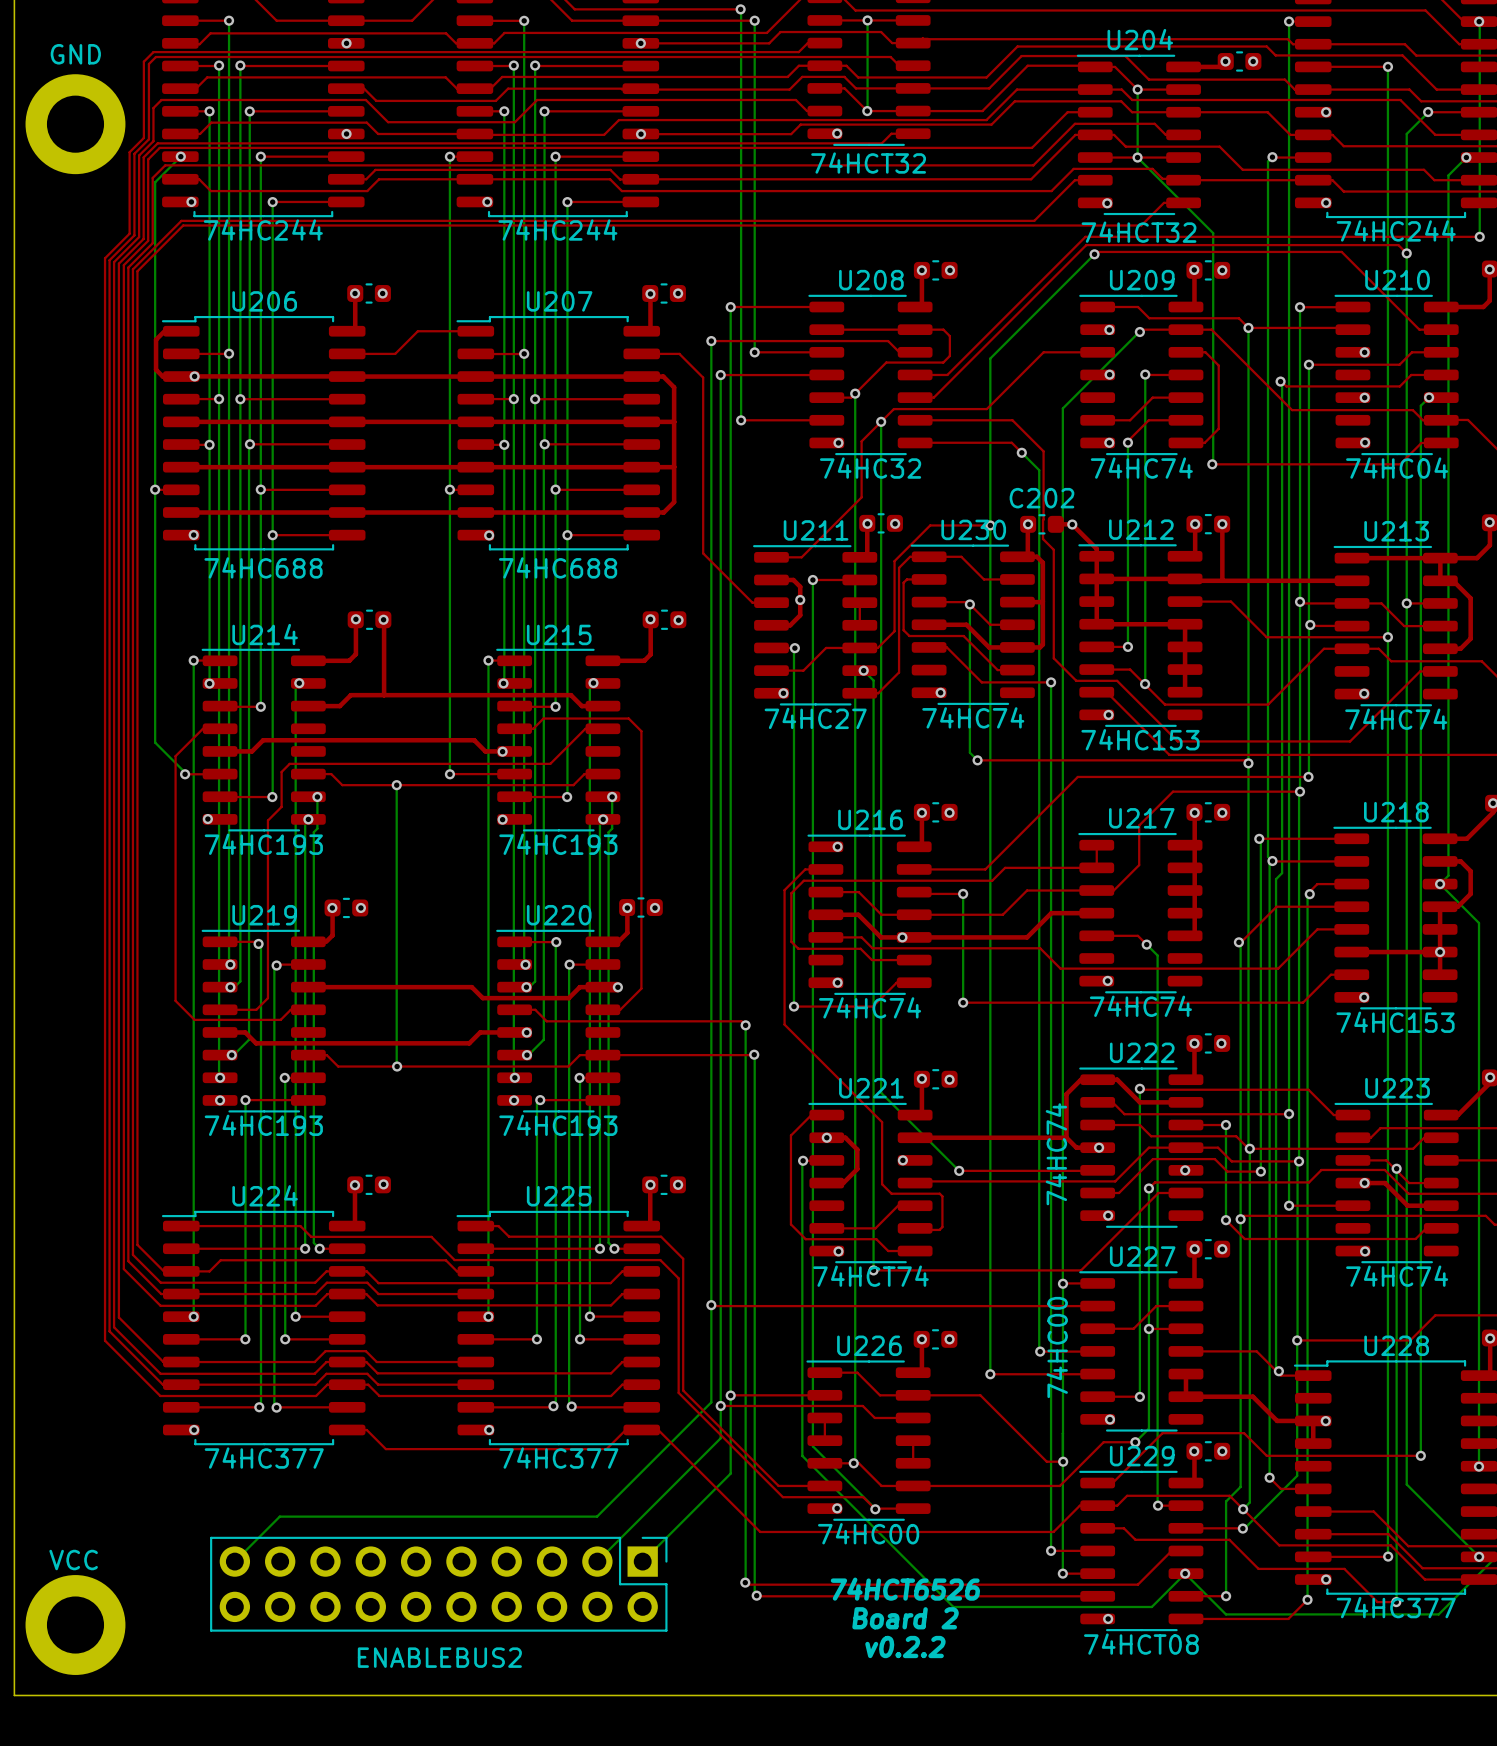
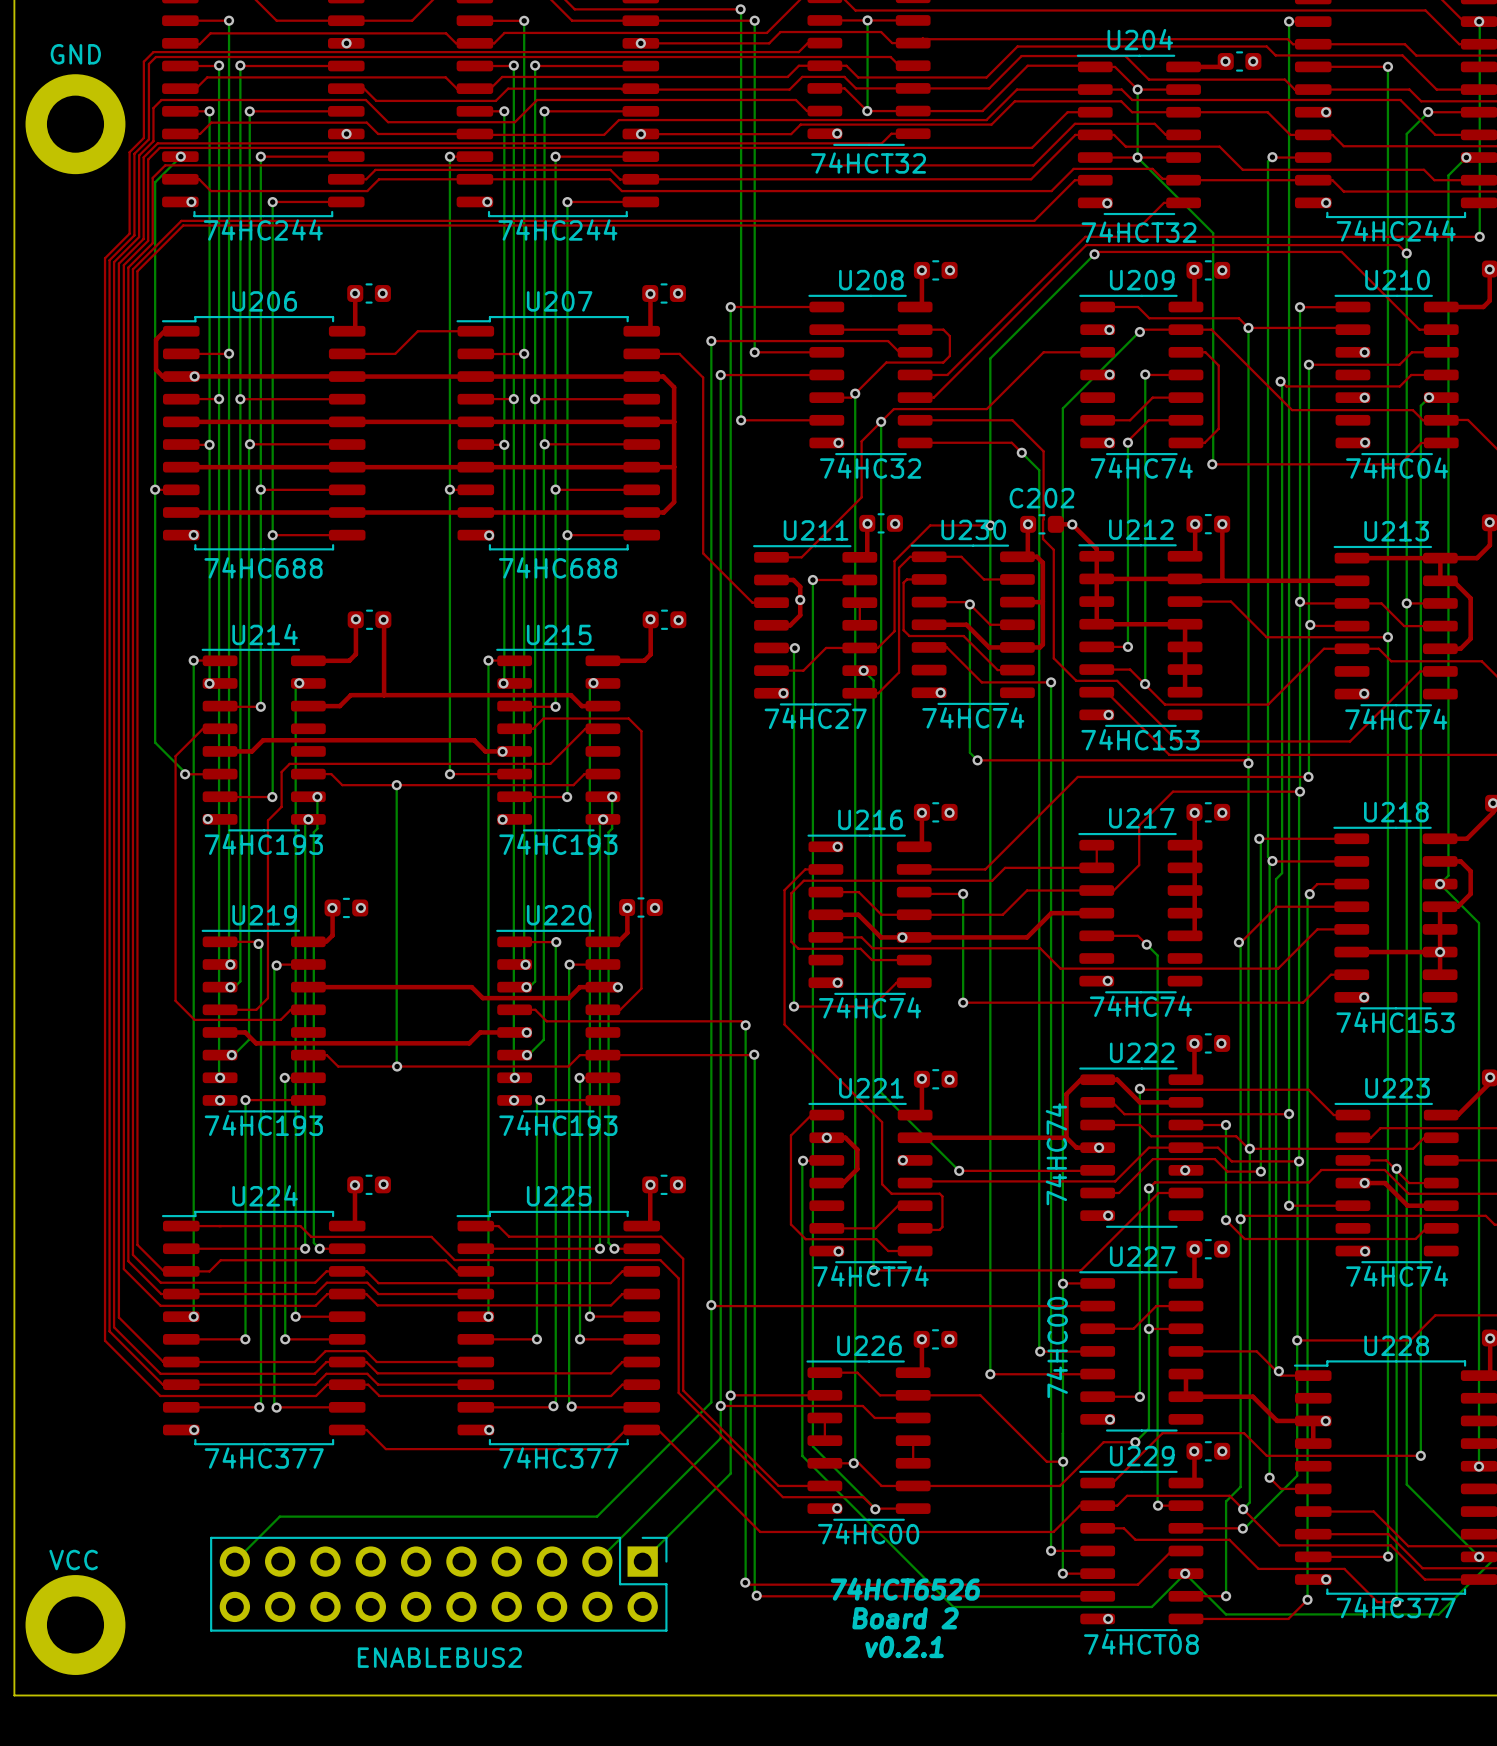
text: v0.2.2 (905, 1647) -> v0.2.1 (904, 1647)

